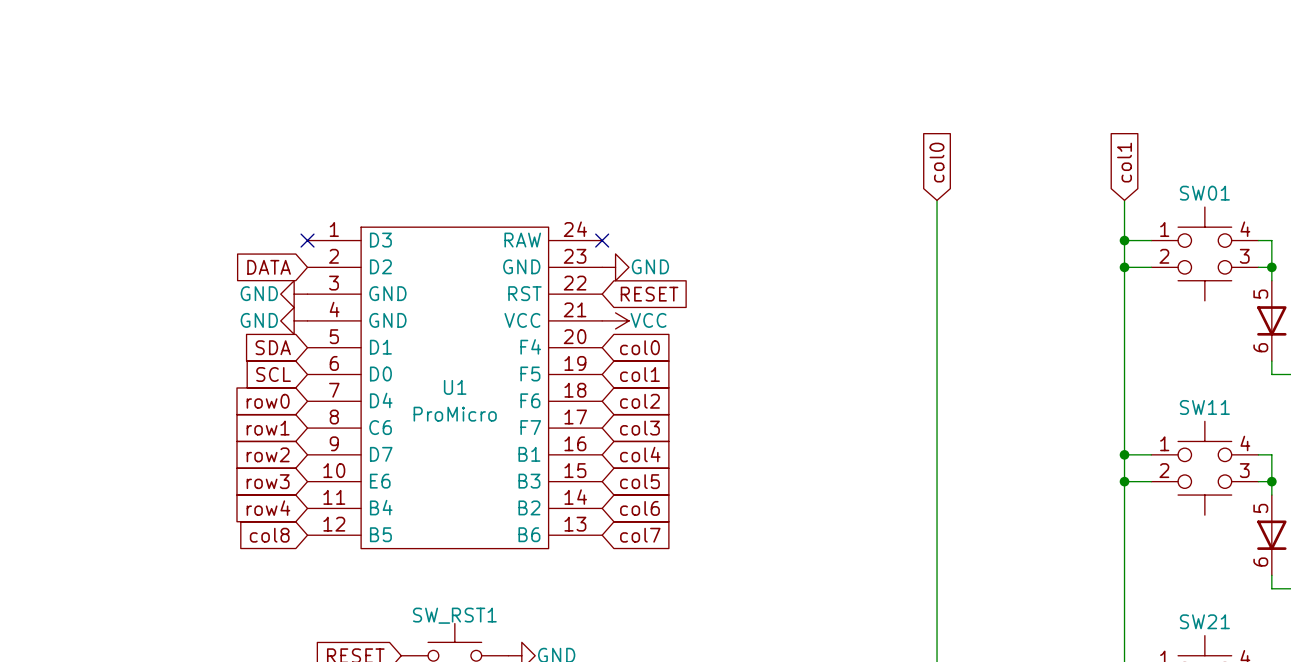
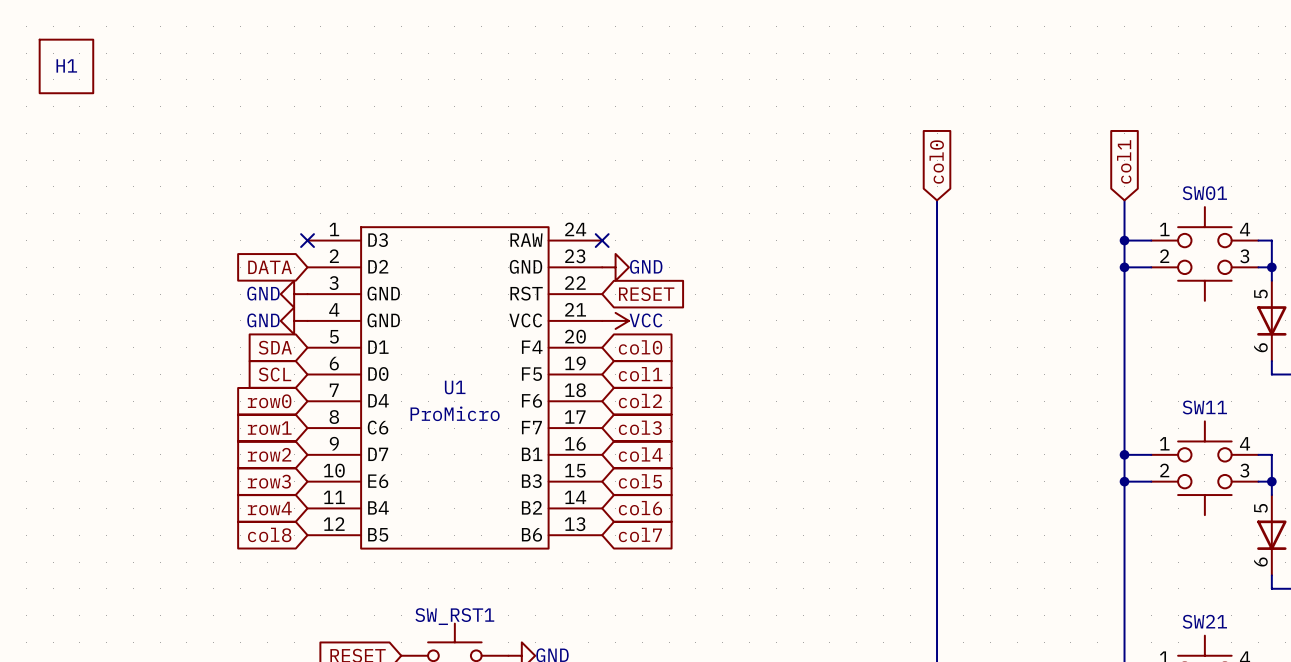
H1: none -> (66, 66)

